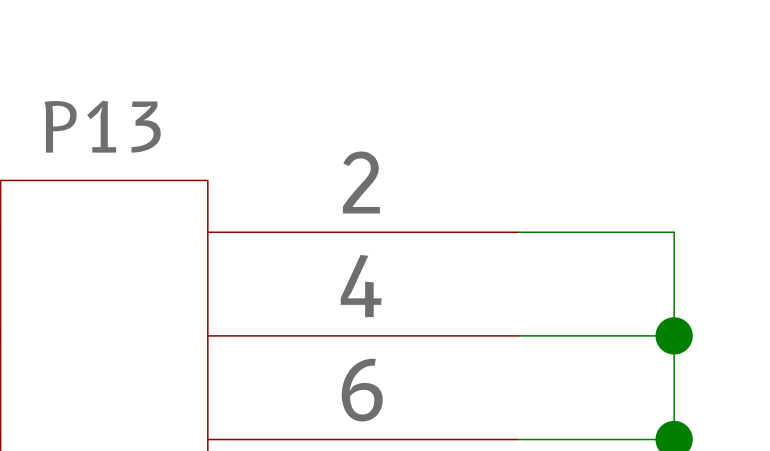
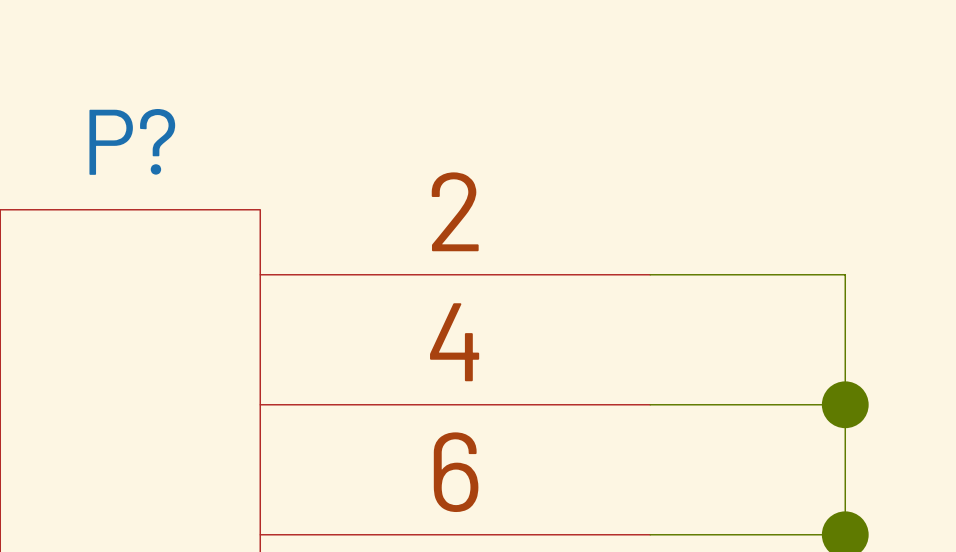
P13 name: P13 (102, 126) -> P? (132, 141)

